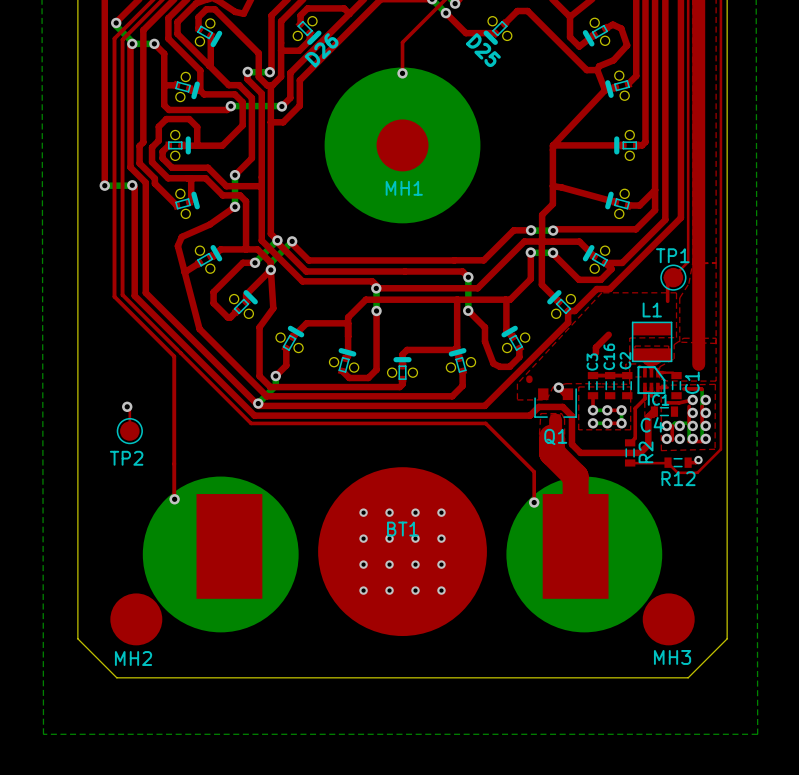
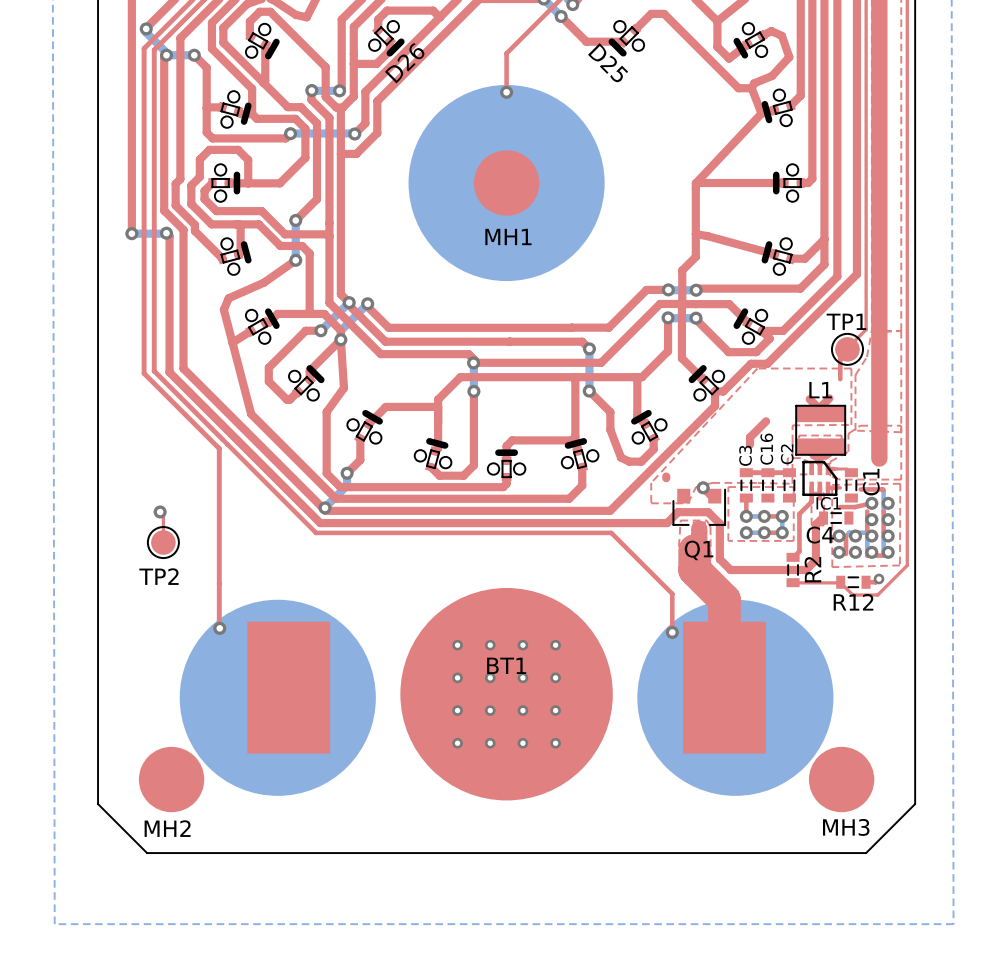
top track: none -> (829, 398) (820, 407) (820, 413)
top track: none -> (809, 399) (820, 410)

